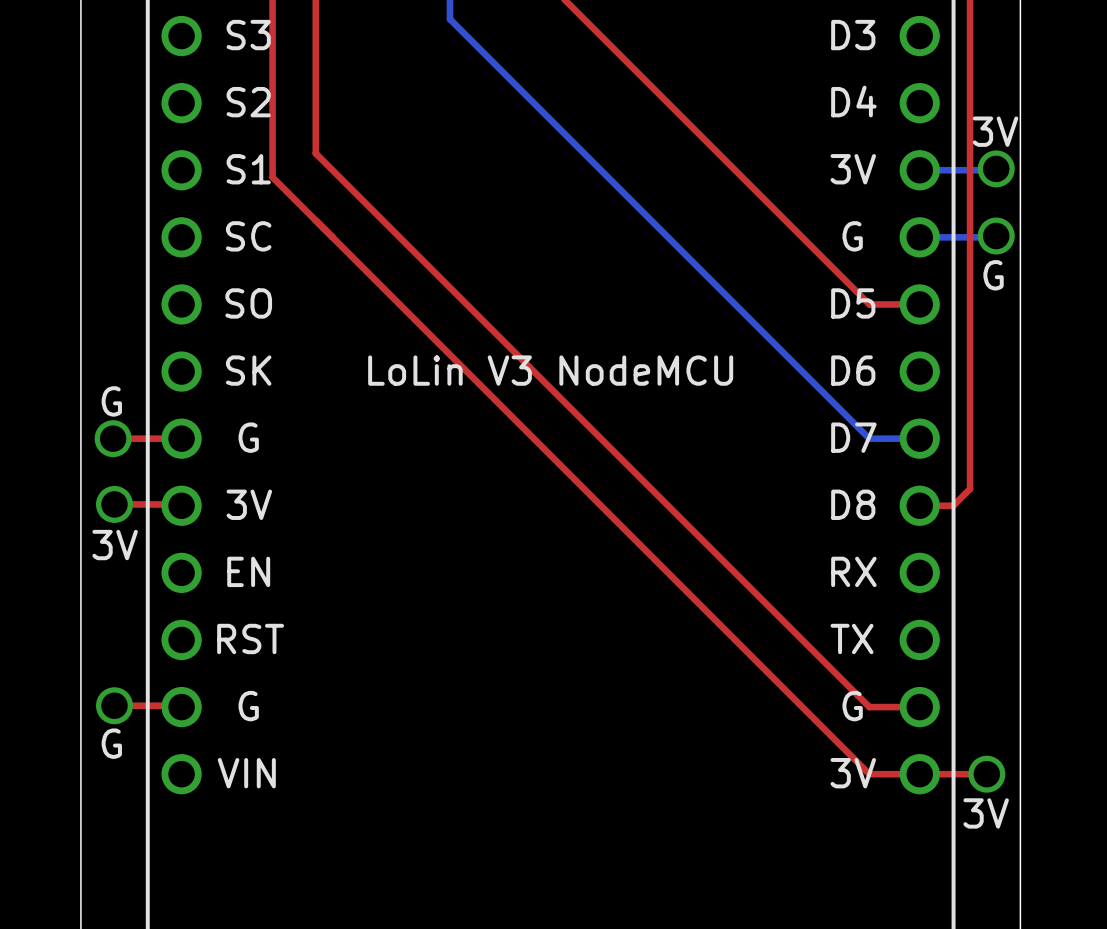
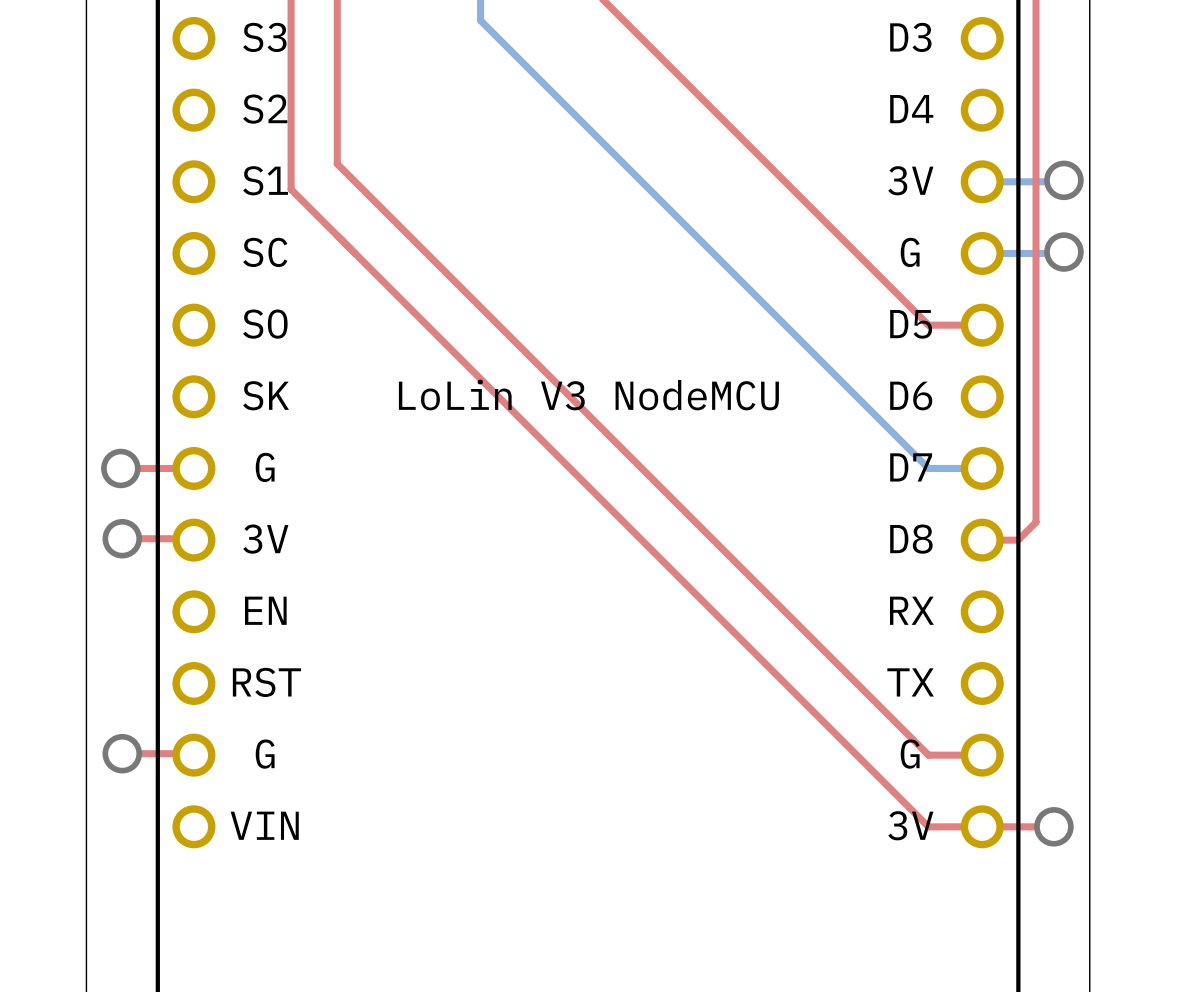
text: 3V (995, 131) -> none
text: G (993, 275) -> none
text: G (111, 401) -> none
text: 3V (115, 545) -> none
text: G (111, 743) -> none
text: 3V (986, 813) -> none

